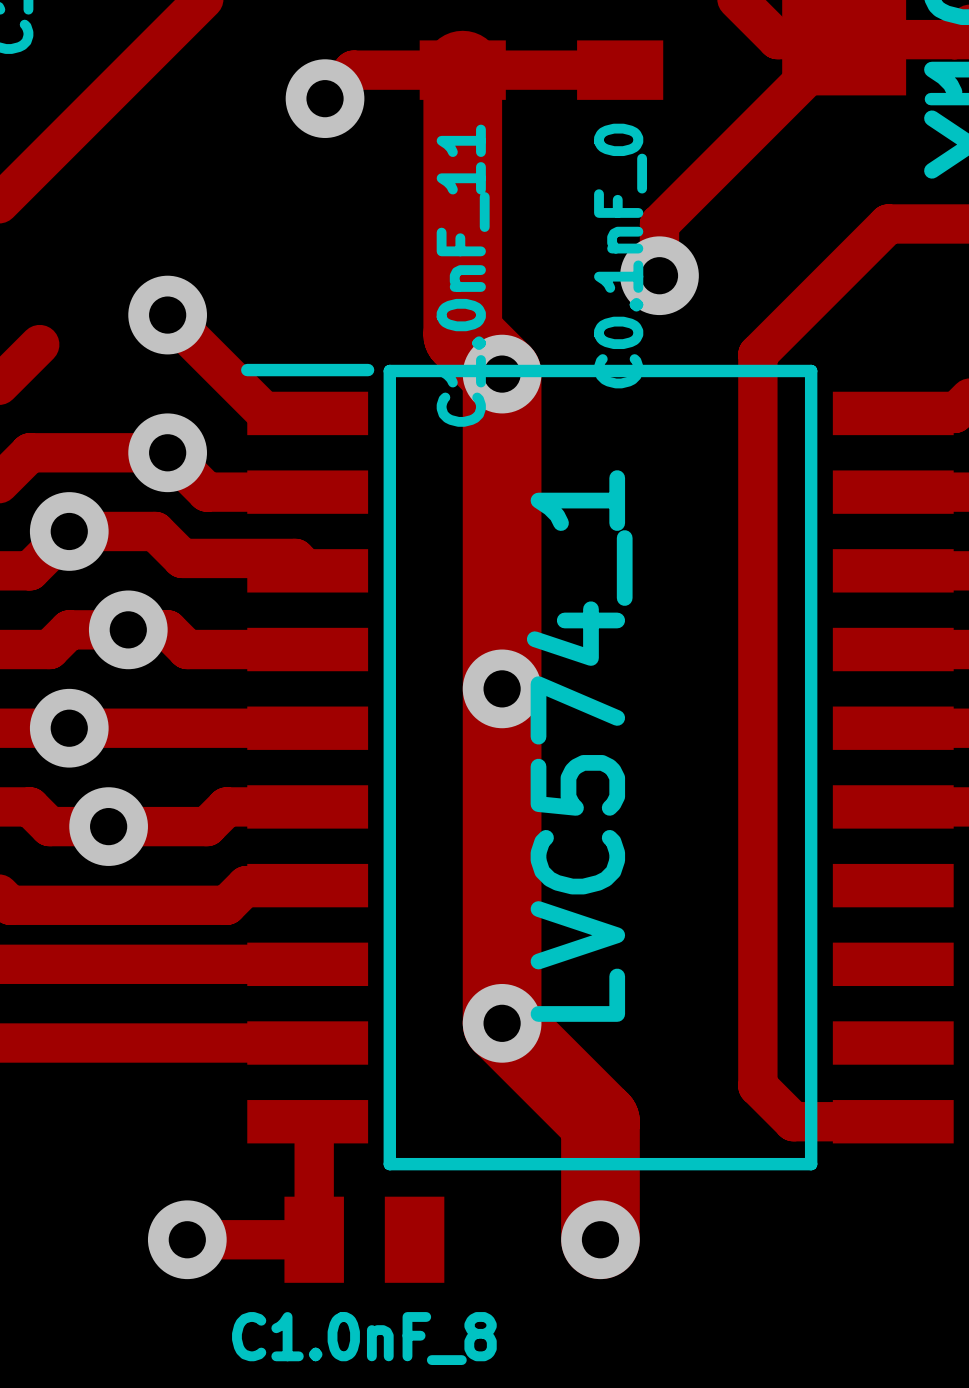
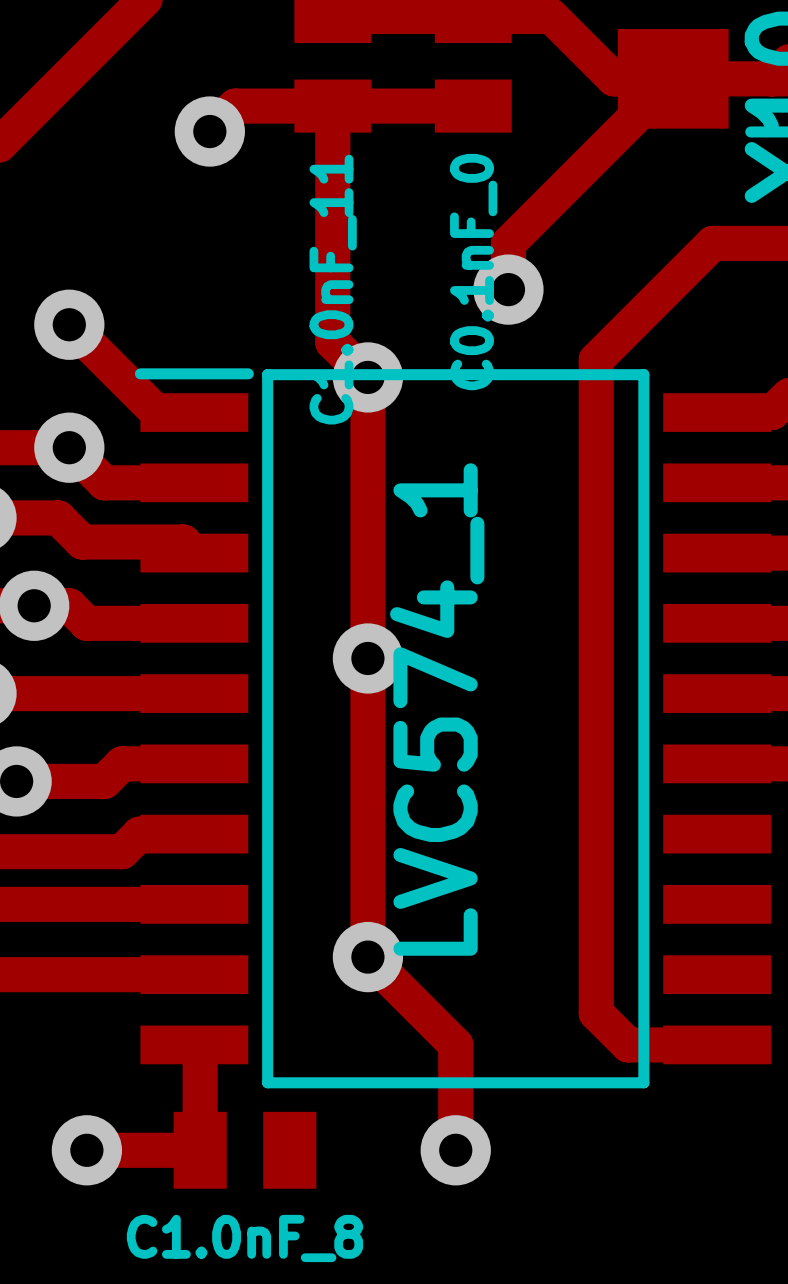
track width: thick (462, 70) (462, 334) (502, 374) (502, 1023) (600, 1121) (600, 1239) -> thin (332, 106) (332, 342) (367, 377) (367, 957) (455, 1044) (455, 1150)

